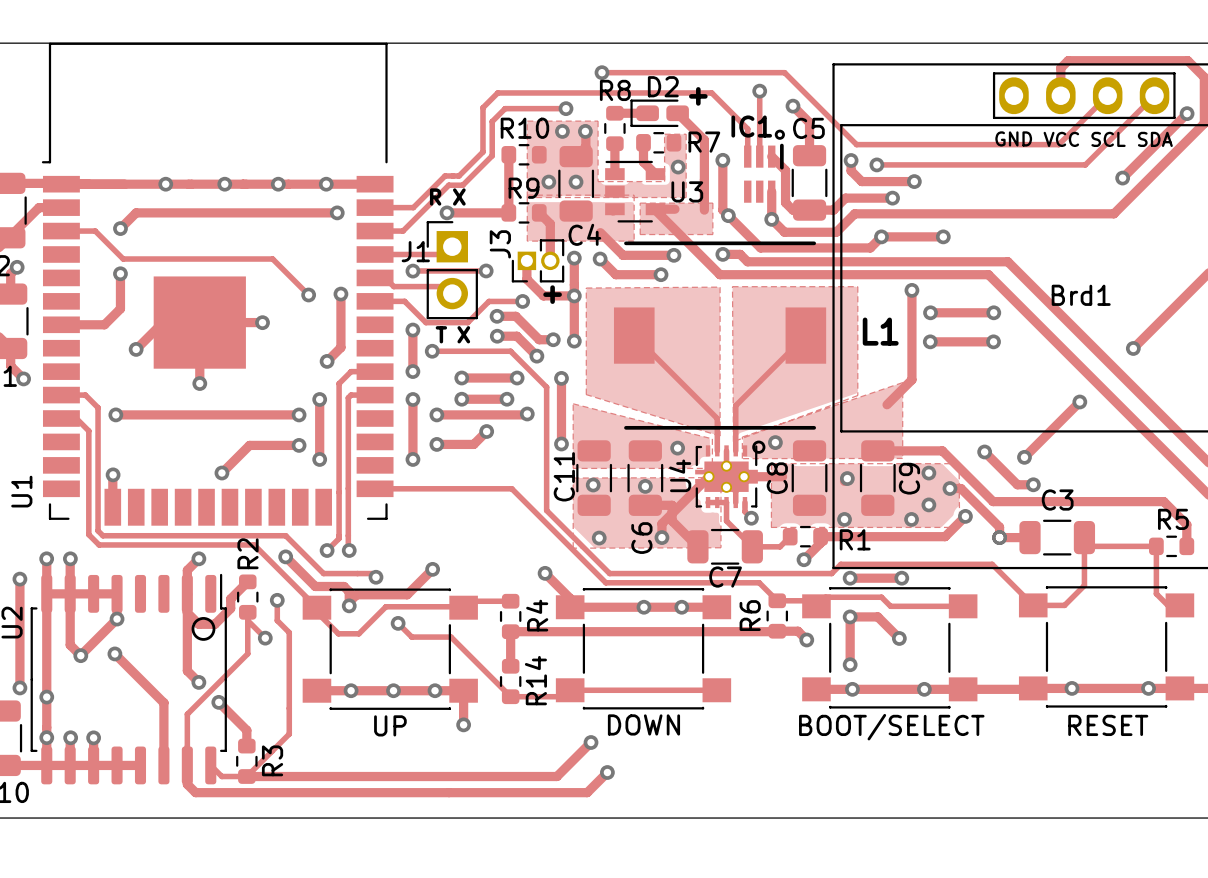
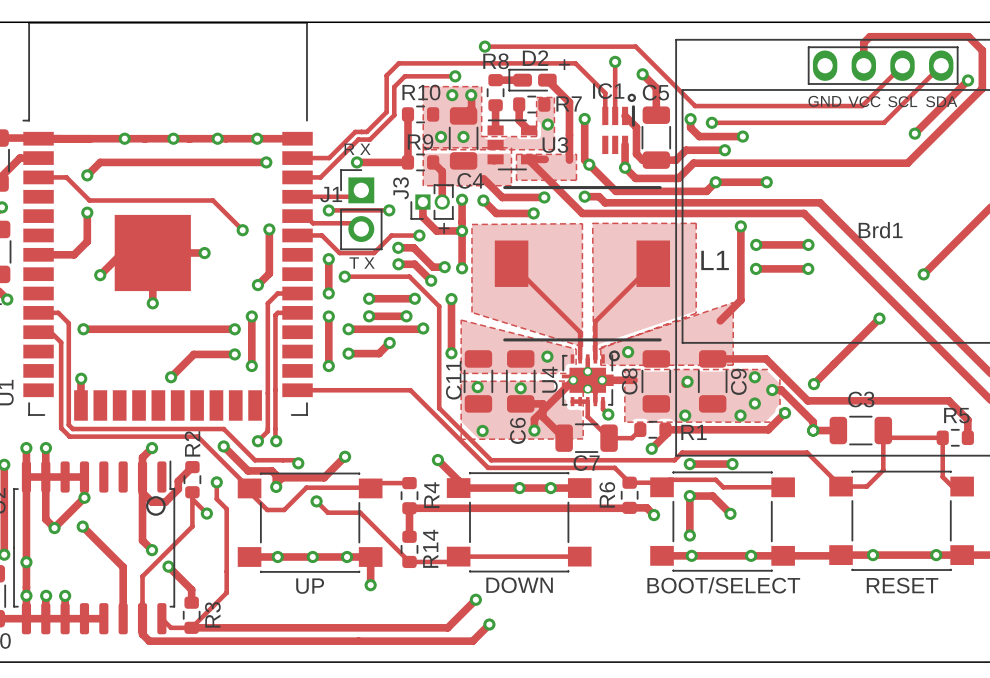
track: (984, 451) (1017, 484) (1033, 484) -> none
via: (984, 451) -> none
track: none -> (833, 364) (813, 384)
via: (1024, 457) -> none
via: none -> (813, 384)
via: (1033, 484) -> none

